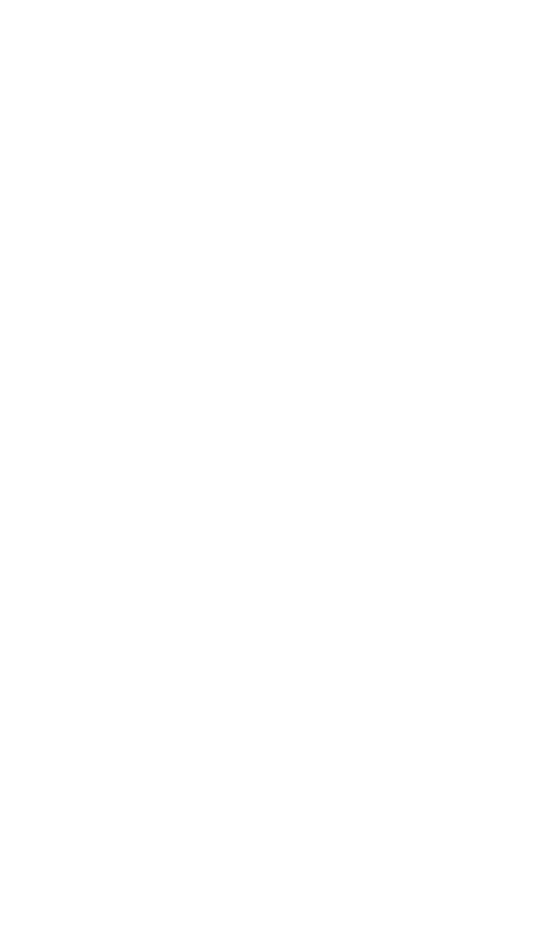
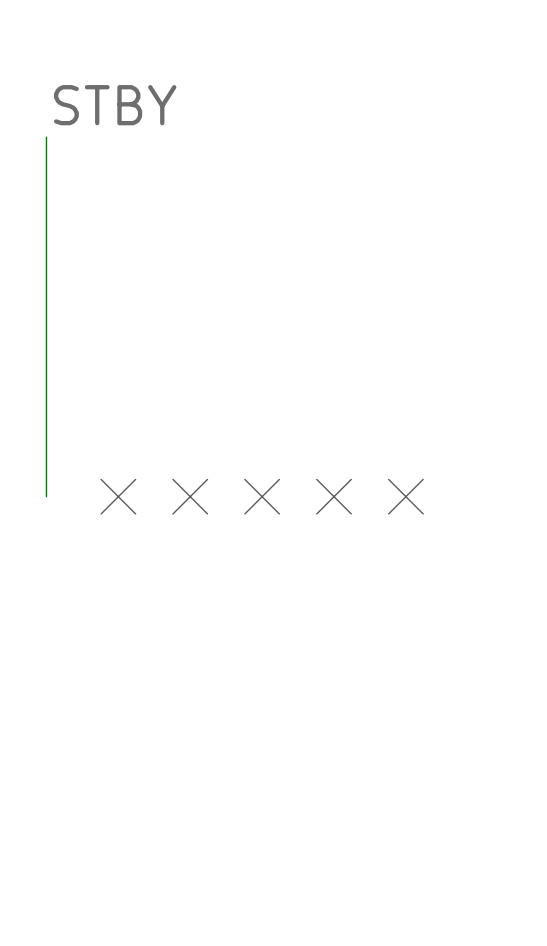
label: none -> STBY (115, 105)
wire: none -> (46, 137) (46, 496)
no-connect mark: none -> (118, 496)
no-connect mark: none -> (190, 496)
no-connect mark: none -> (262, 496)
no-connect mark: none -> (334, 496)
no-connect mark: none -> (405, 496)

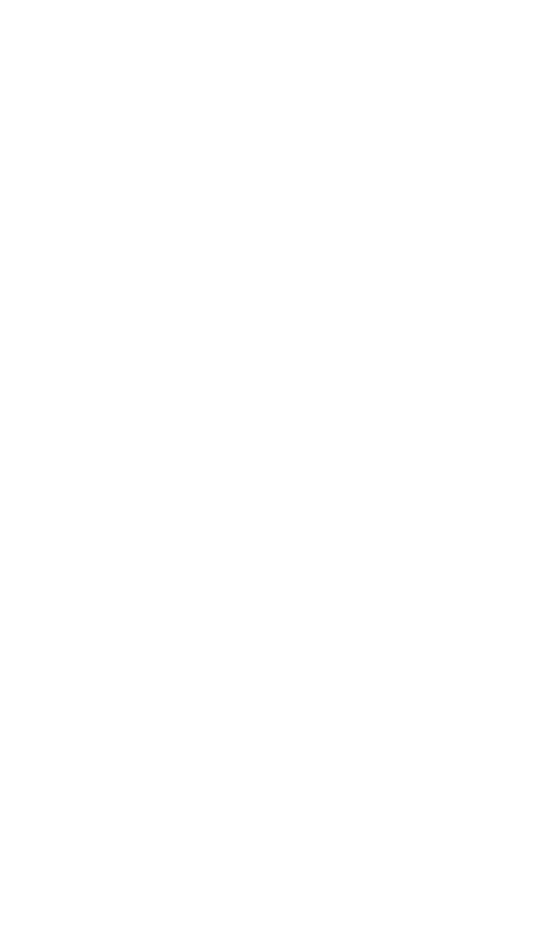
label: STBY (115, 105) -> none
wire: (46, 137) (46, 496) -> none
no-connect mark: (118, 496) -> none
no-connect mark: (190, 496) -> none
no-connect mark: (262, 496) -> none
no-connect mark: (334, 496) -> none
no-connect mark: (405, 496) -> none

